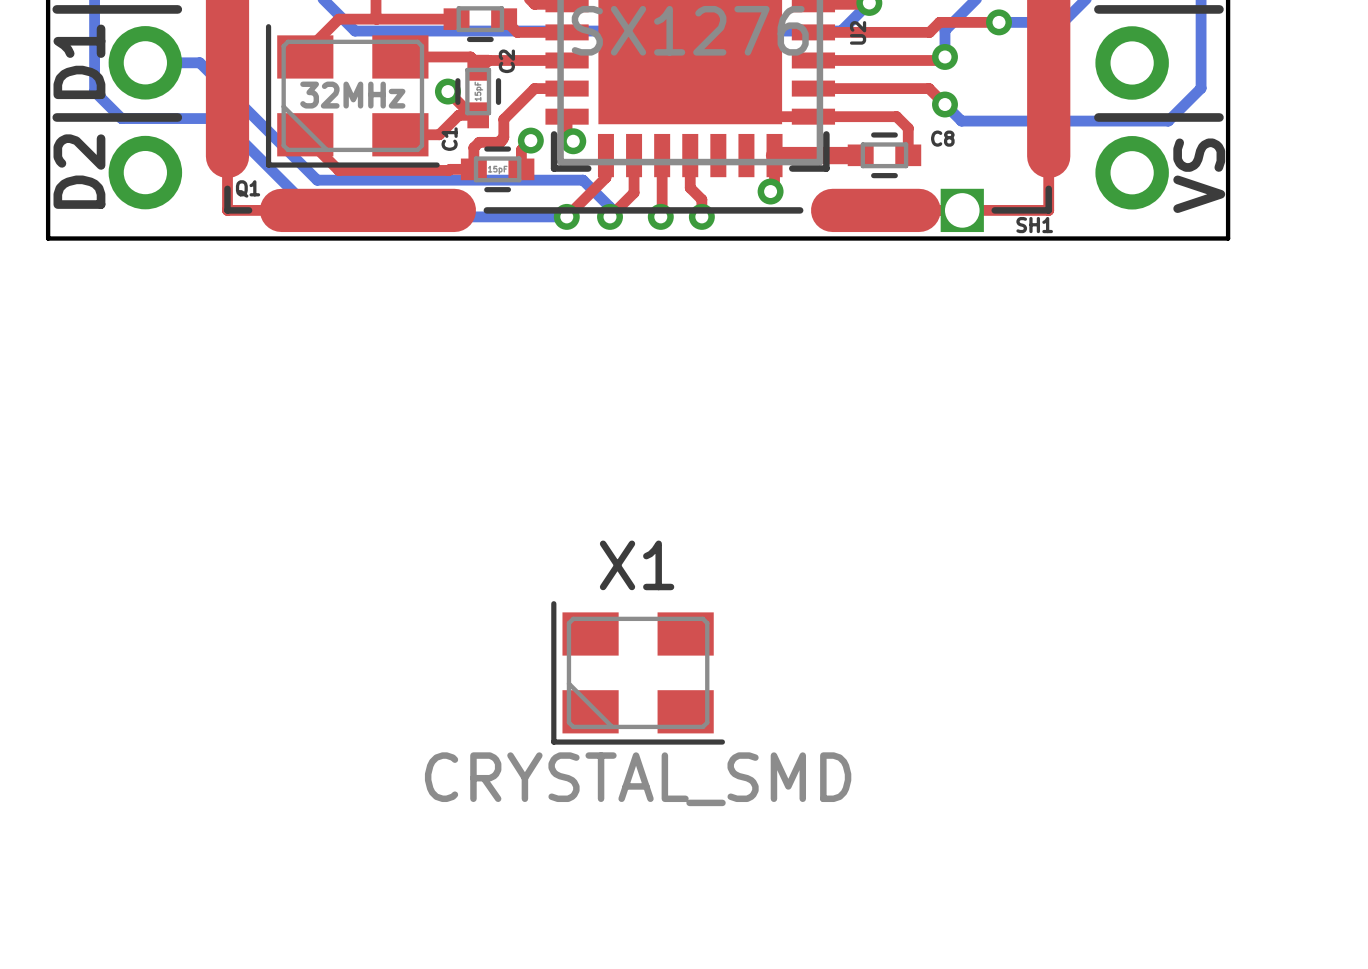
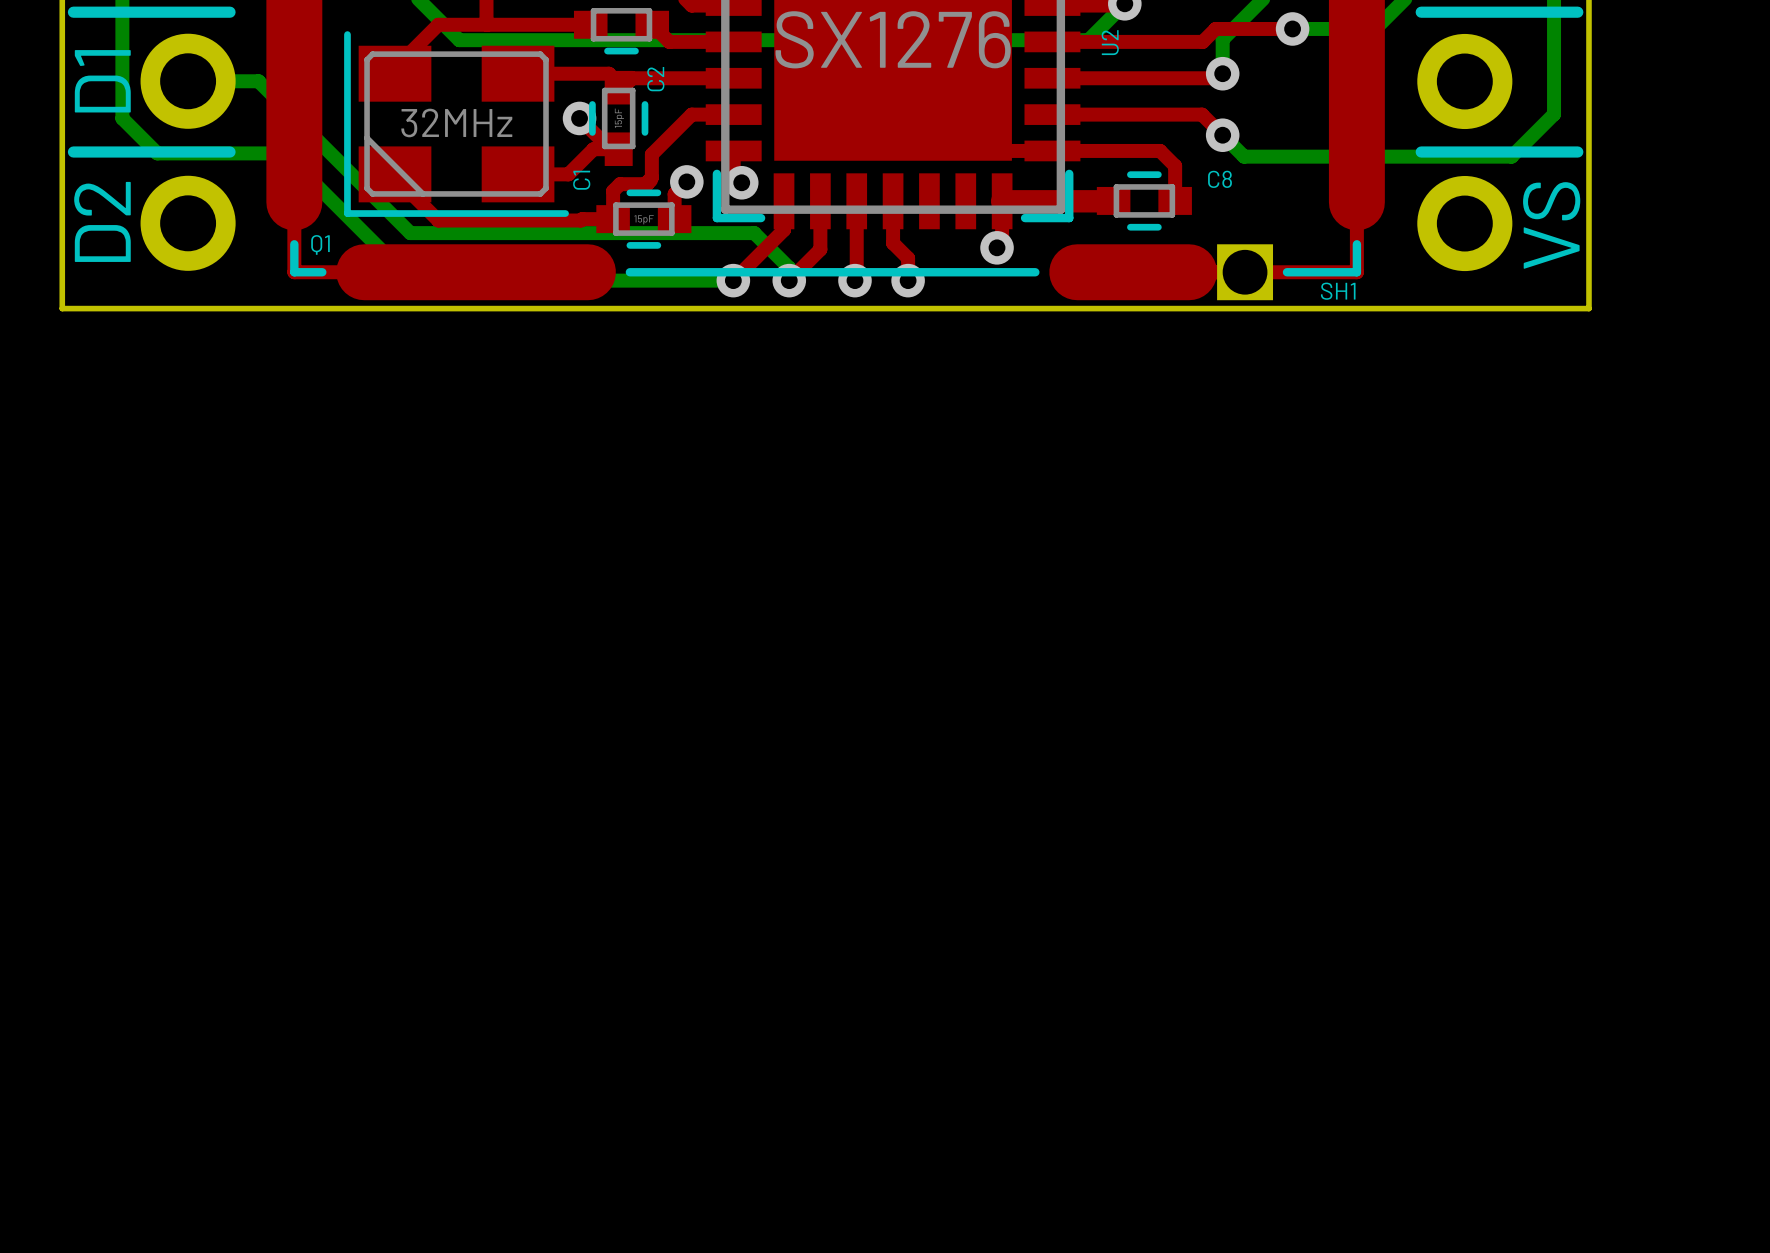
X1: CRYSTAL_SMD (638, 672) -> none

